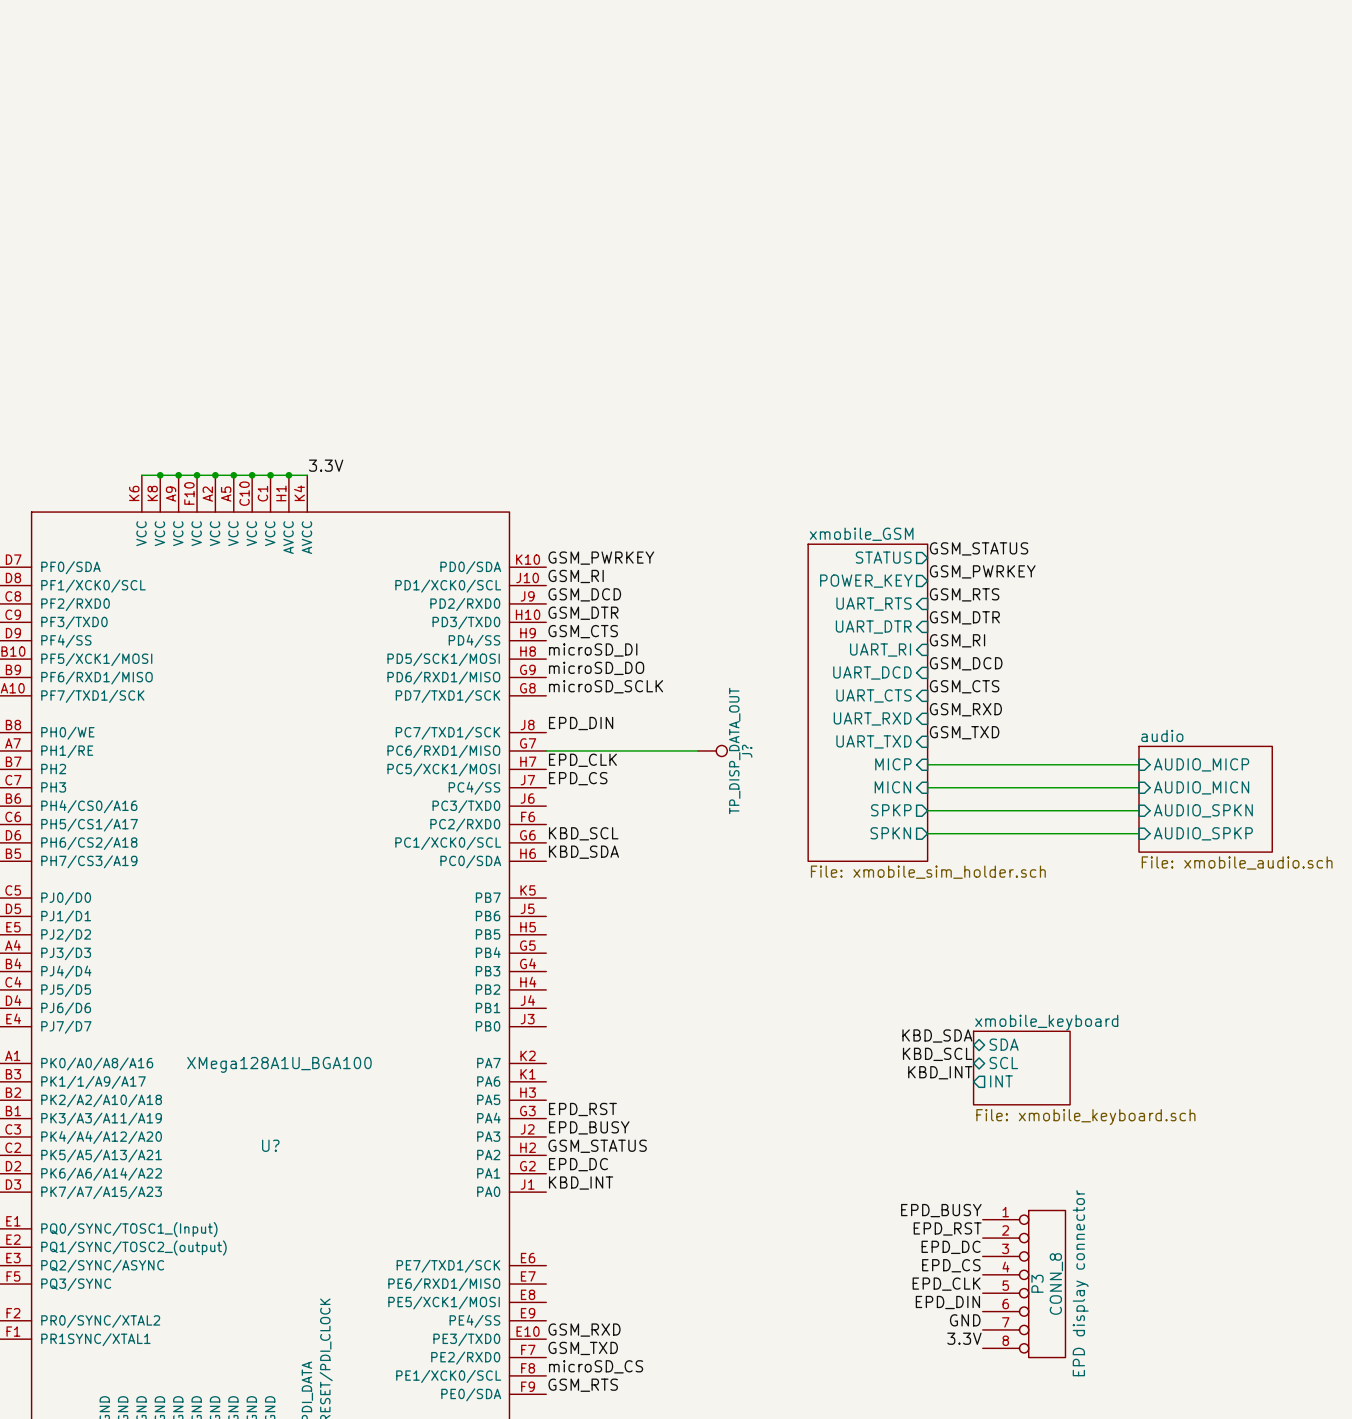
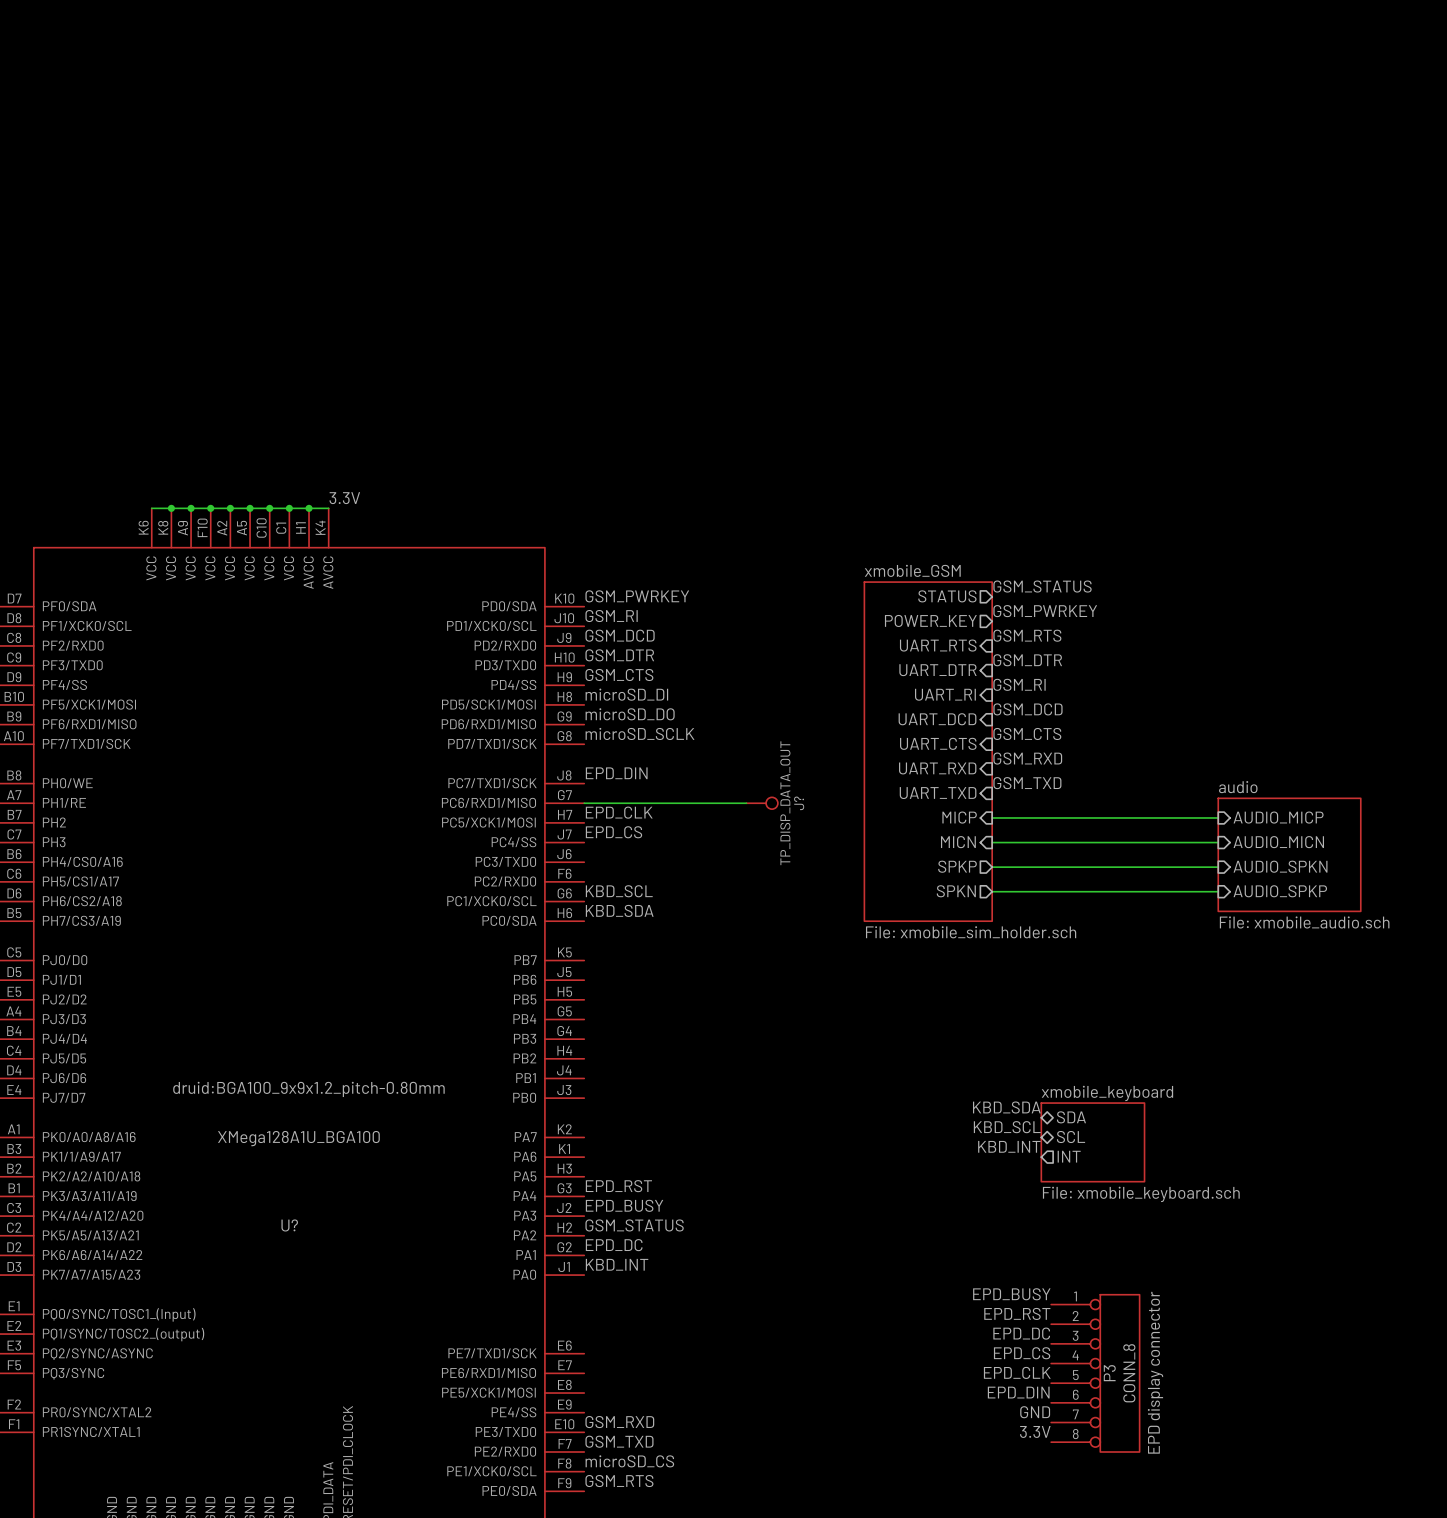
U? text: none -> druid:BGA100_9x9x1.2_pitch-0.80mm (308, 1089)

